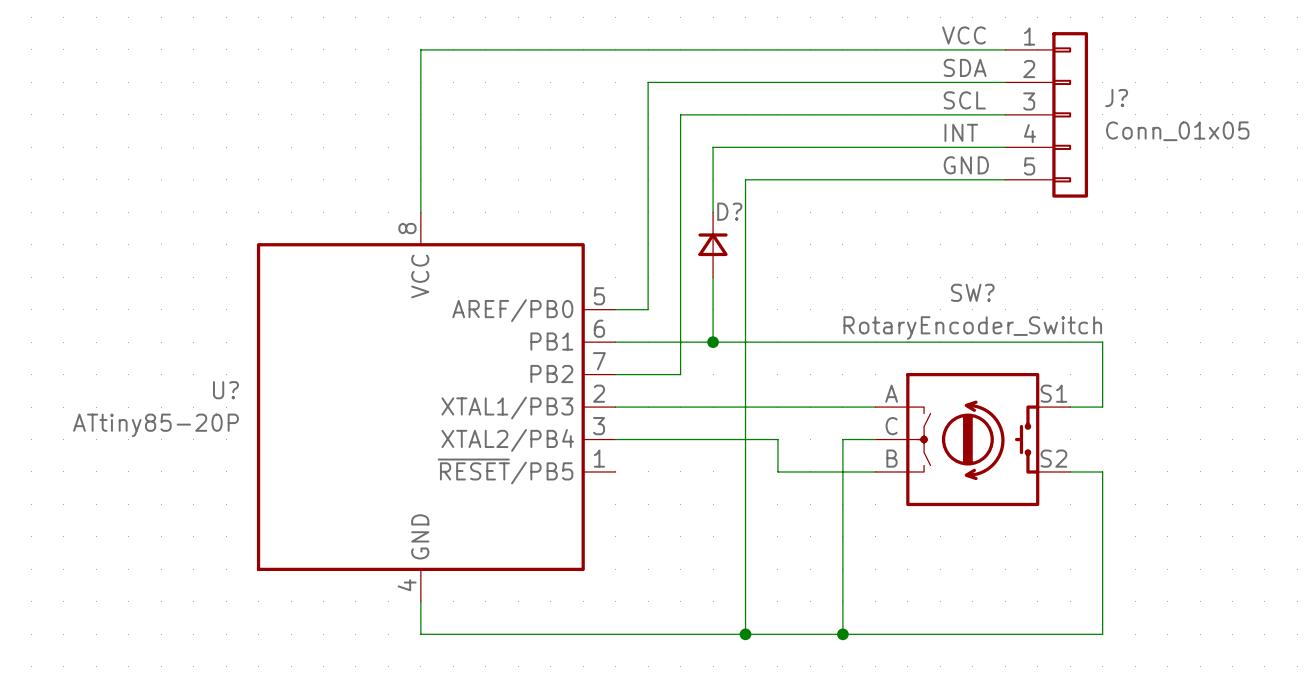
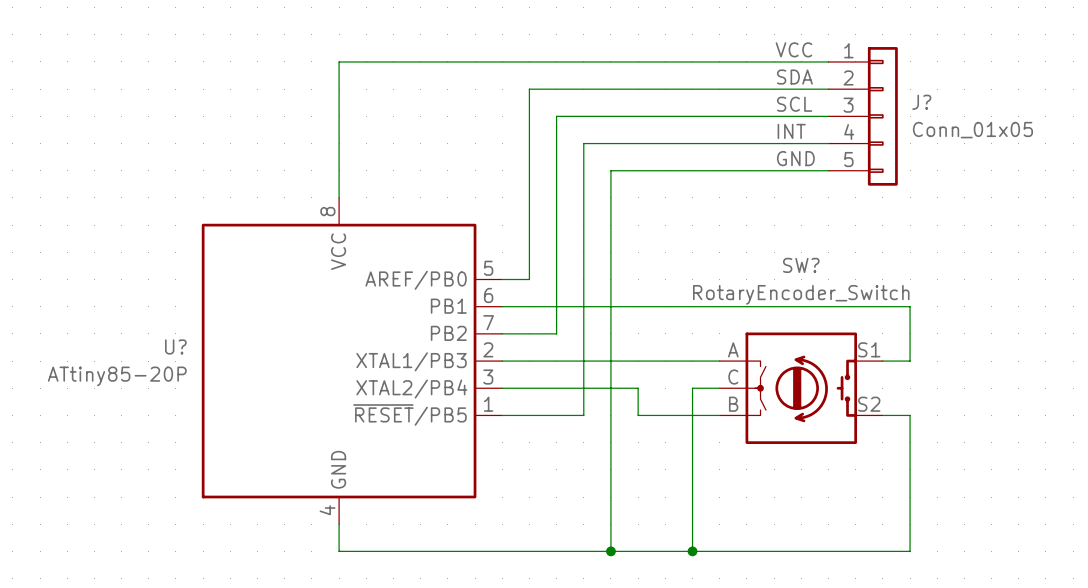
D?: (713, 244) -> none
wire: none -> (583, 306) (583, 415) (502, 415)
junction: (713, 342) -> none

